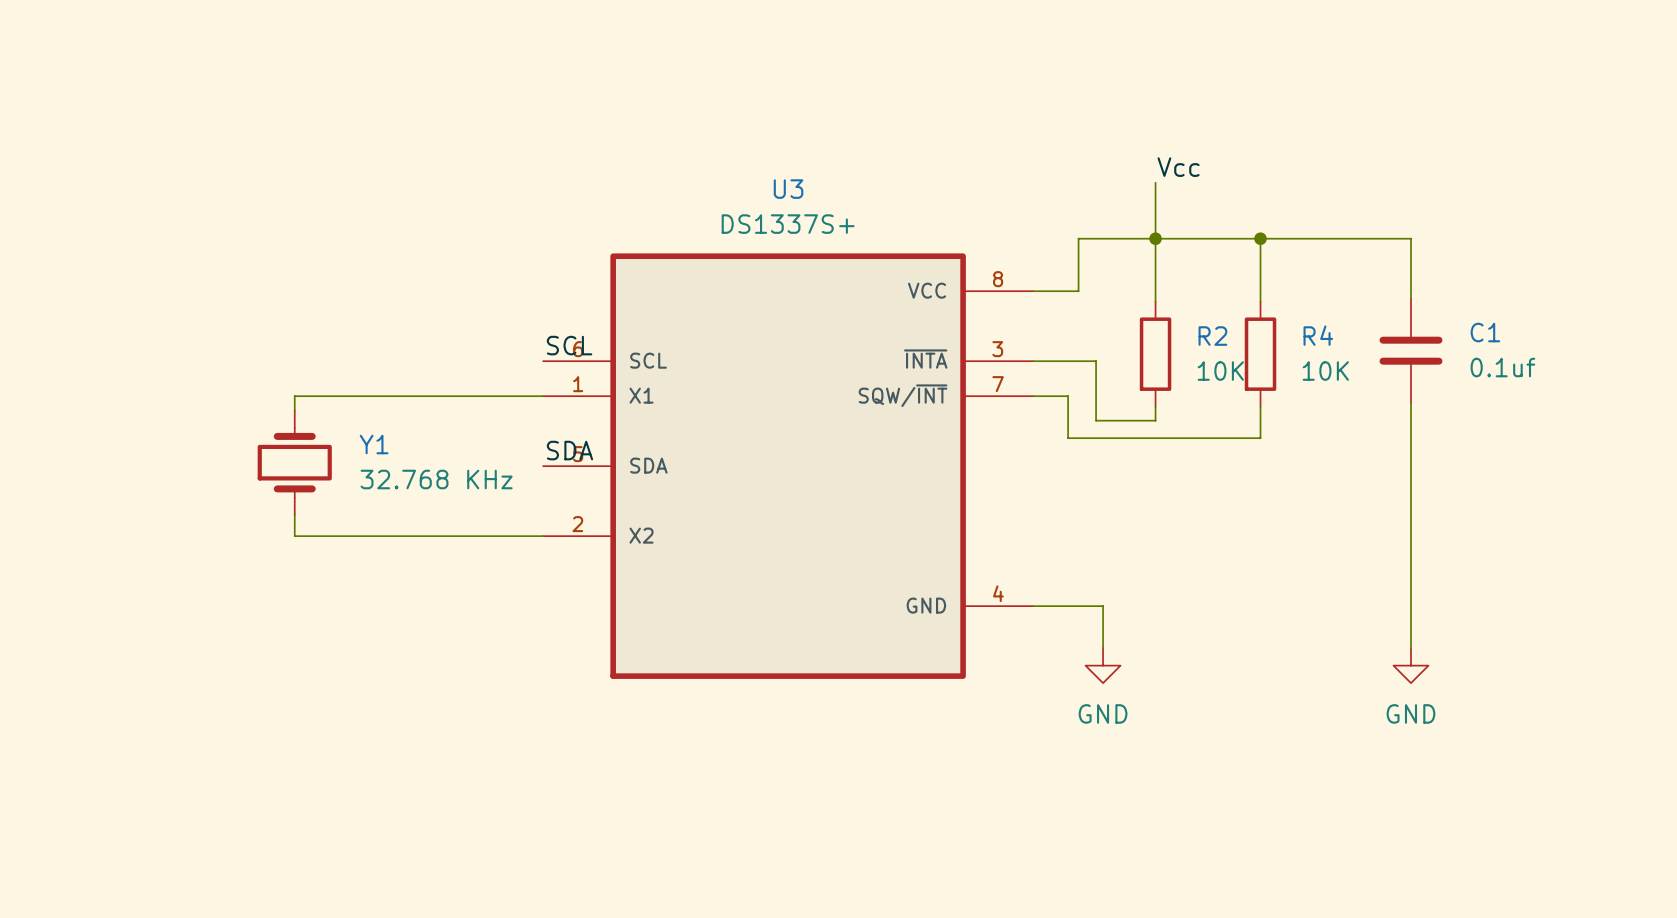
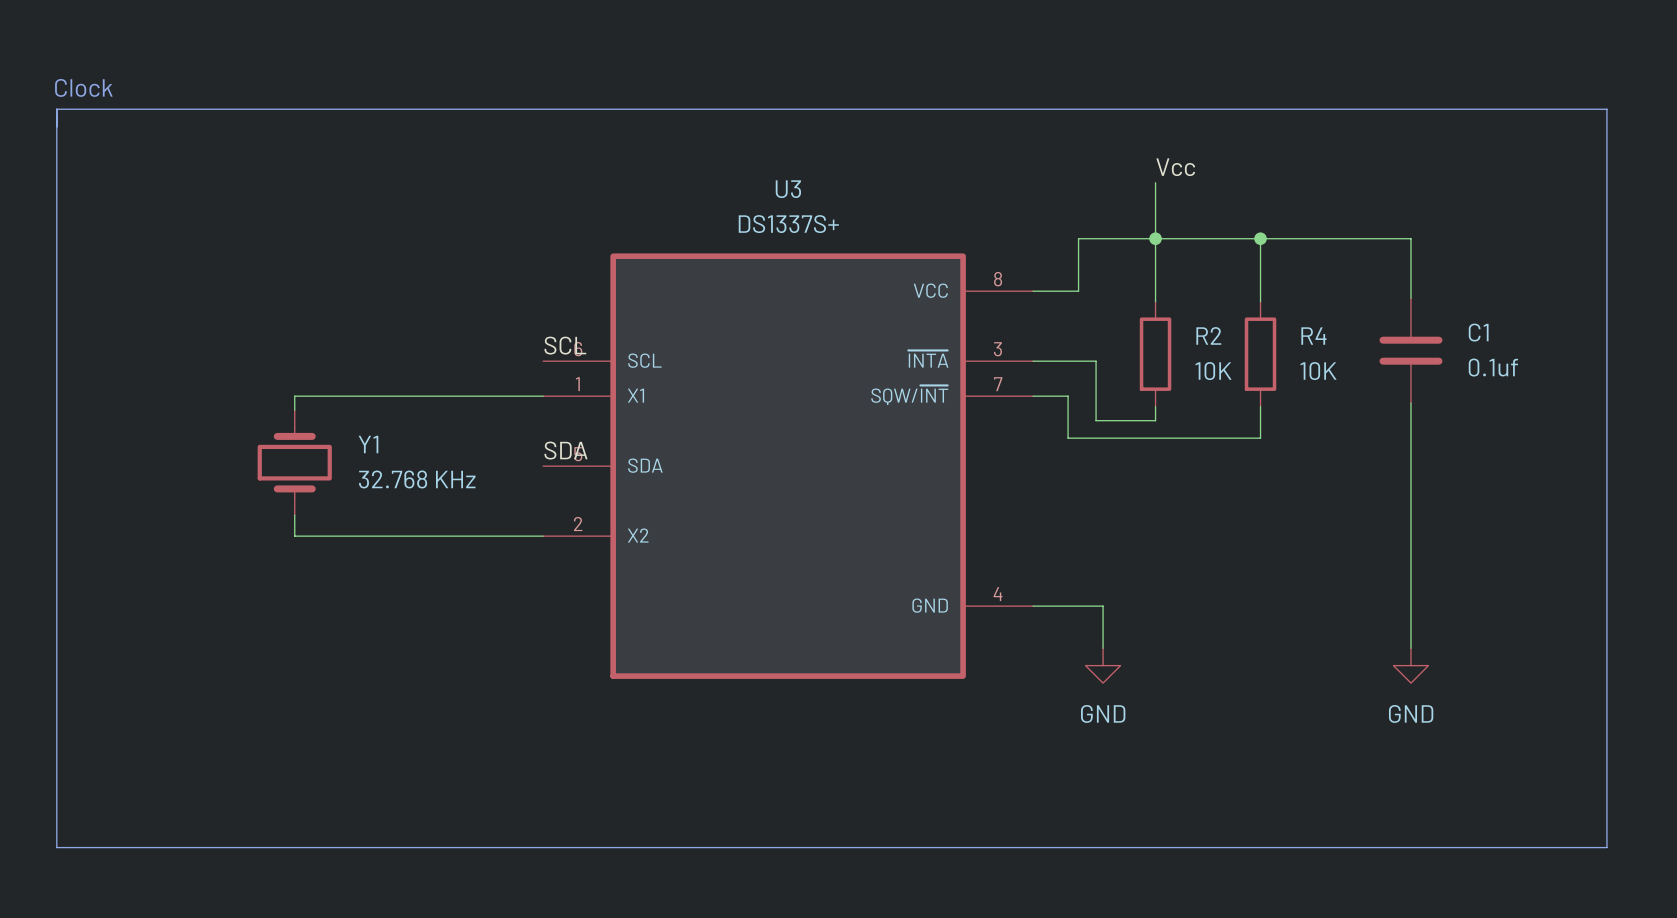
text: none -> Clock (83, 87)
line: none -> (56, 109) (56, 847) (1606, 847) (1606, 109) (56, 109)

